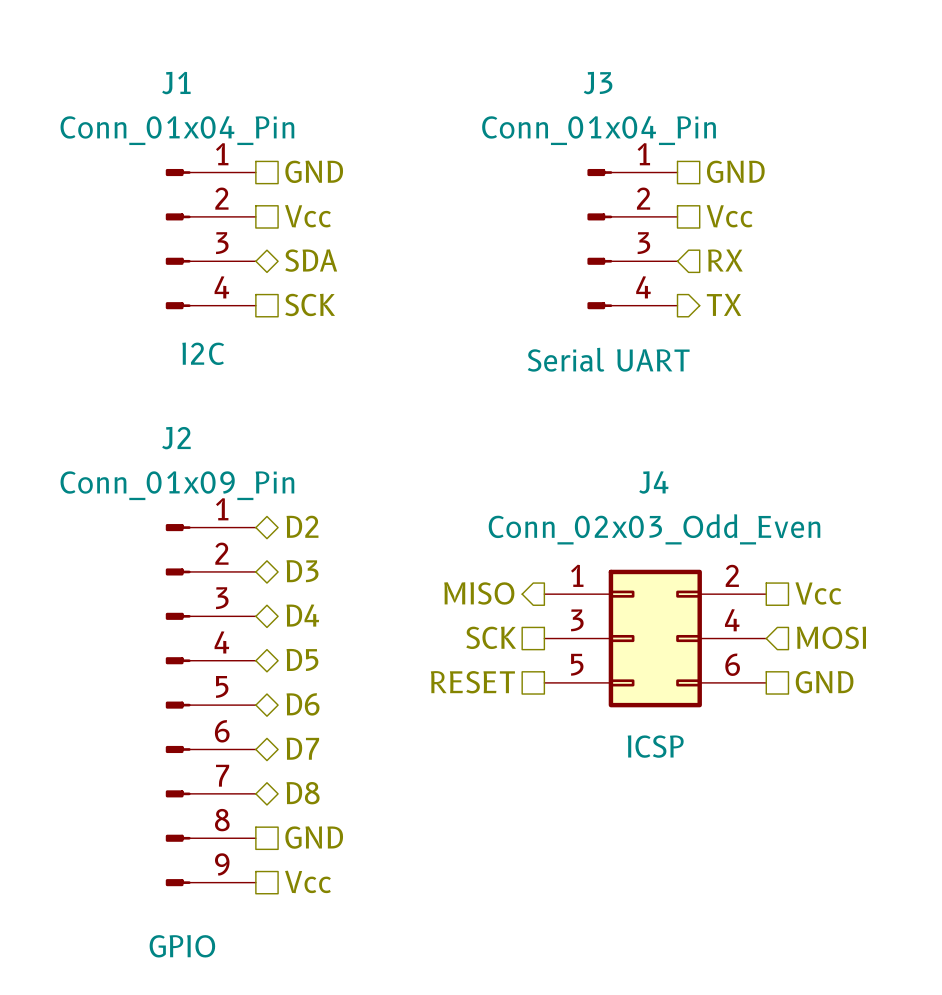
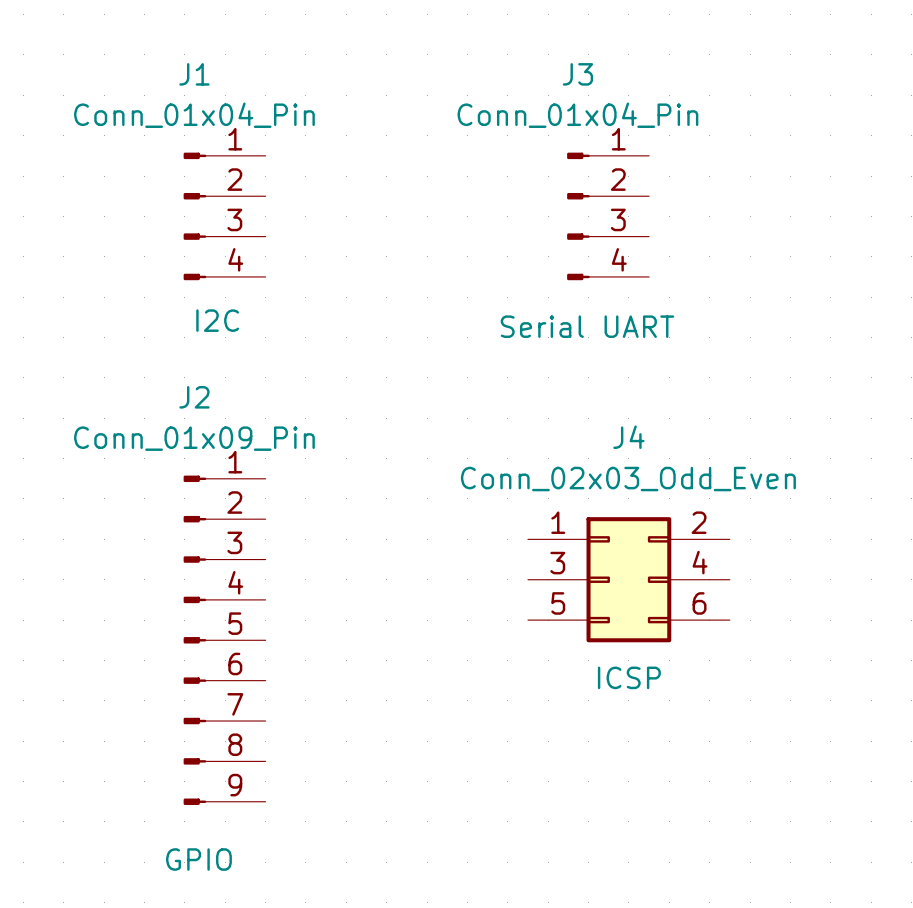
hierarchical label: GND (314, 171) -> none
hierarchical label: GND (735, 171) -> none
hierarchical label: Vcc (307, 216) -> none
hierarchical label: Vcc (729, 216) -> none
hierarchical label: SDA (311, 260) -> none
hierarchical label: RX (725, 260) -> none
hierarchical label: SCK (310, 304) -> none
hierarchical label: TX (724, 304) -> none
hierarchical label: D2 (302, 526) -> none
hierarchical label: D3 (302, 571) -> none
hierarchical label: MISO (479, 593) -> none
hierarchical label: Vcc (818, 593) -> none
hierarchical label: D4 (302, 615) -> none
hierarchical label: SCK (491, 637) -> none
hierarchical label: MOSI (831, 637) -> none
hierarchical label: D5 (302, 659) -> none
hierarchical label: RESET (472, 682) -> none
hierarchical label: GND (824, 682) -> none
hierarchical label: D6 (303, 704) -> none
hierarchical label: D7 (302, 748) -> none
hierarchical label: D8 (303, 793) -> none
hierarchical label: GND (314, 837) -> none
hierarchical label: Vcc (307, 881) -> none

